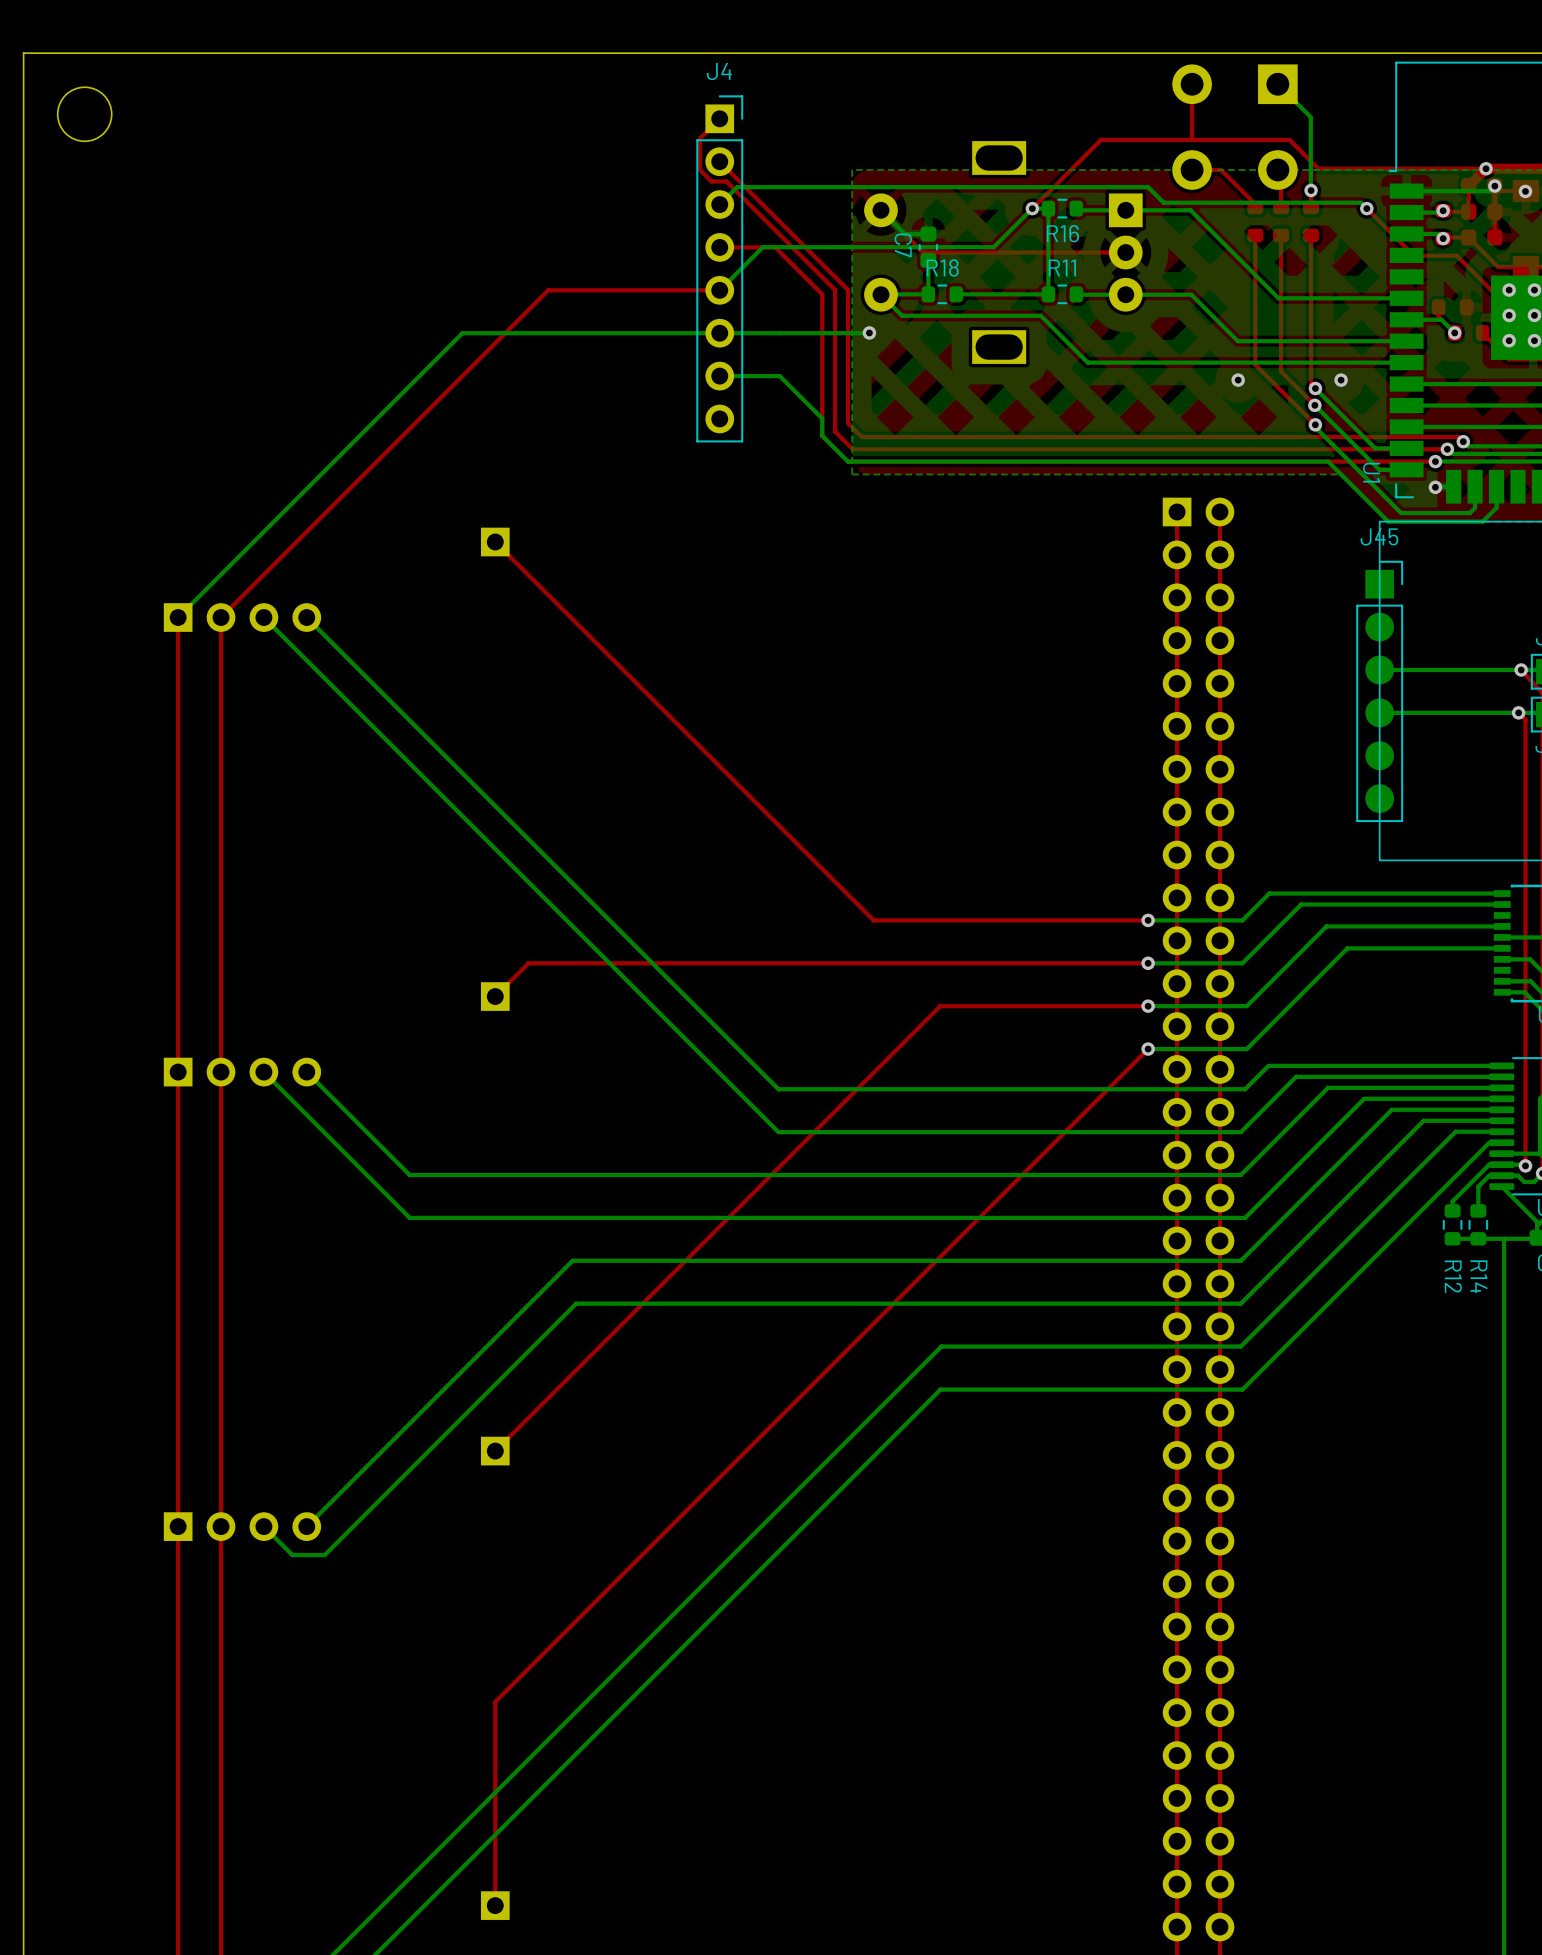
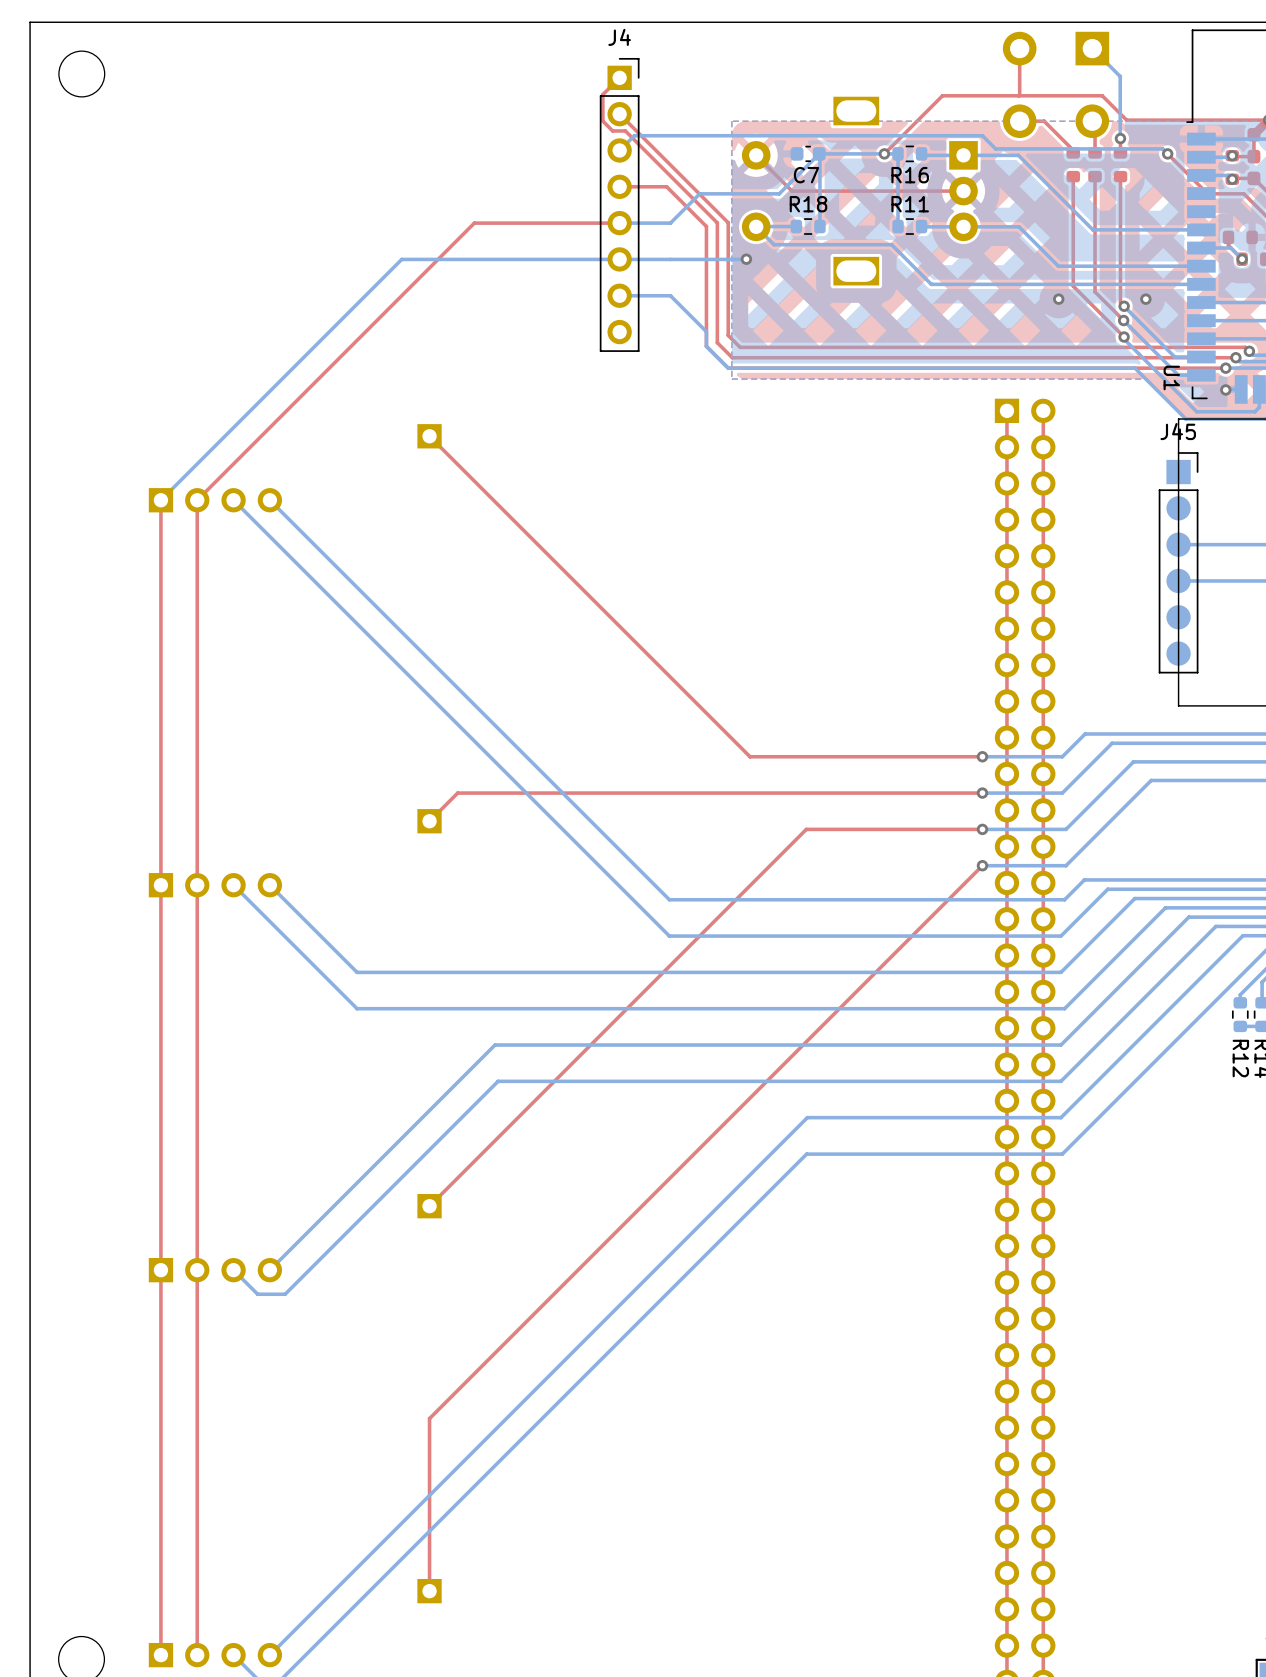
bottom track: (1032, 208) (993, 247) (762, 247) (719, 290) -> (819, 153) (779, 193) (699, 193) (670, 223) (619, 223)
bottom track: none -> (884, 153) (819, 153)
bottom track: (880, 210) (904, 234) (928, 234) -> none
C7 name position: C7 (903, 245) -> C7 (806, 175)
C7 rotation: 0° (928, 247) -> 90° clockwise (808, 153)
C7 position: (928, 247) -> (808, 153)
bottom track: (928, 260) (928, 294) -> none
bottom track: (1048, 294) (956, 294) -> (819, 153) (819, 226)

